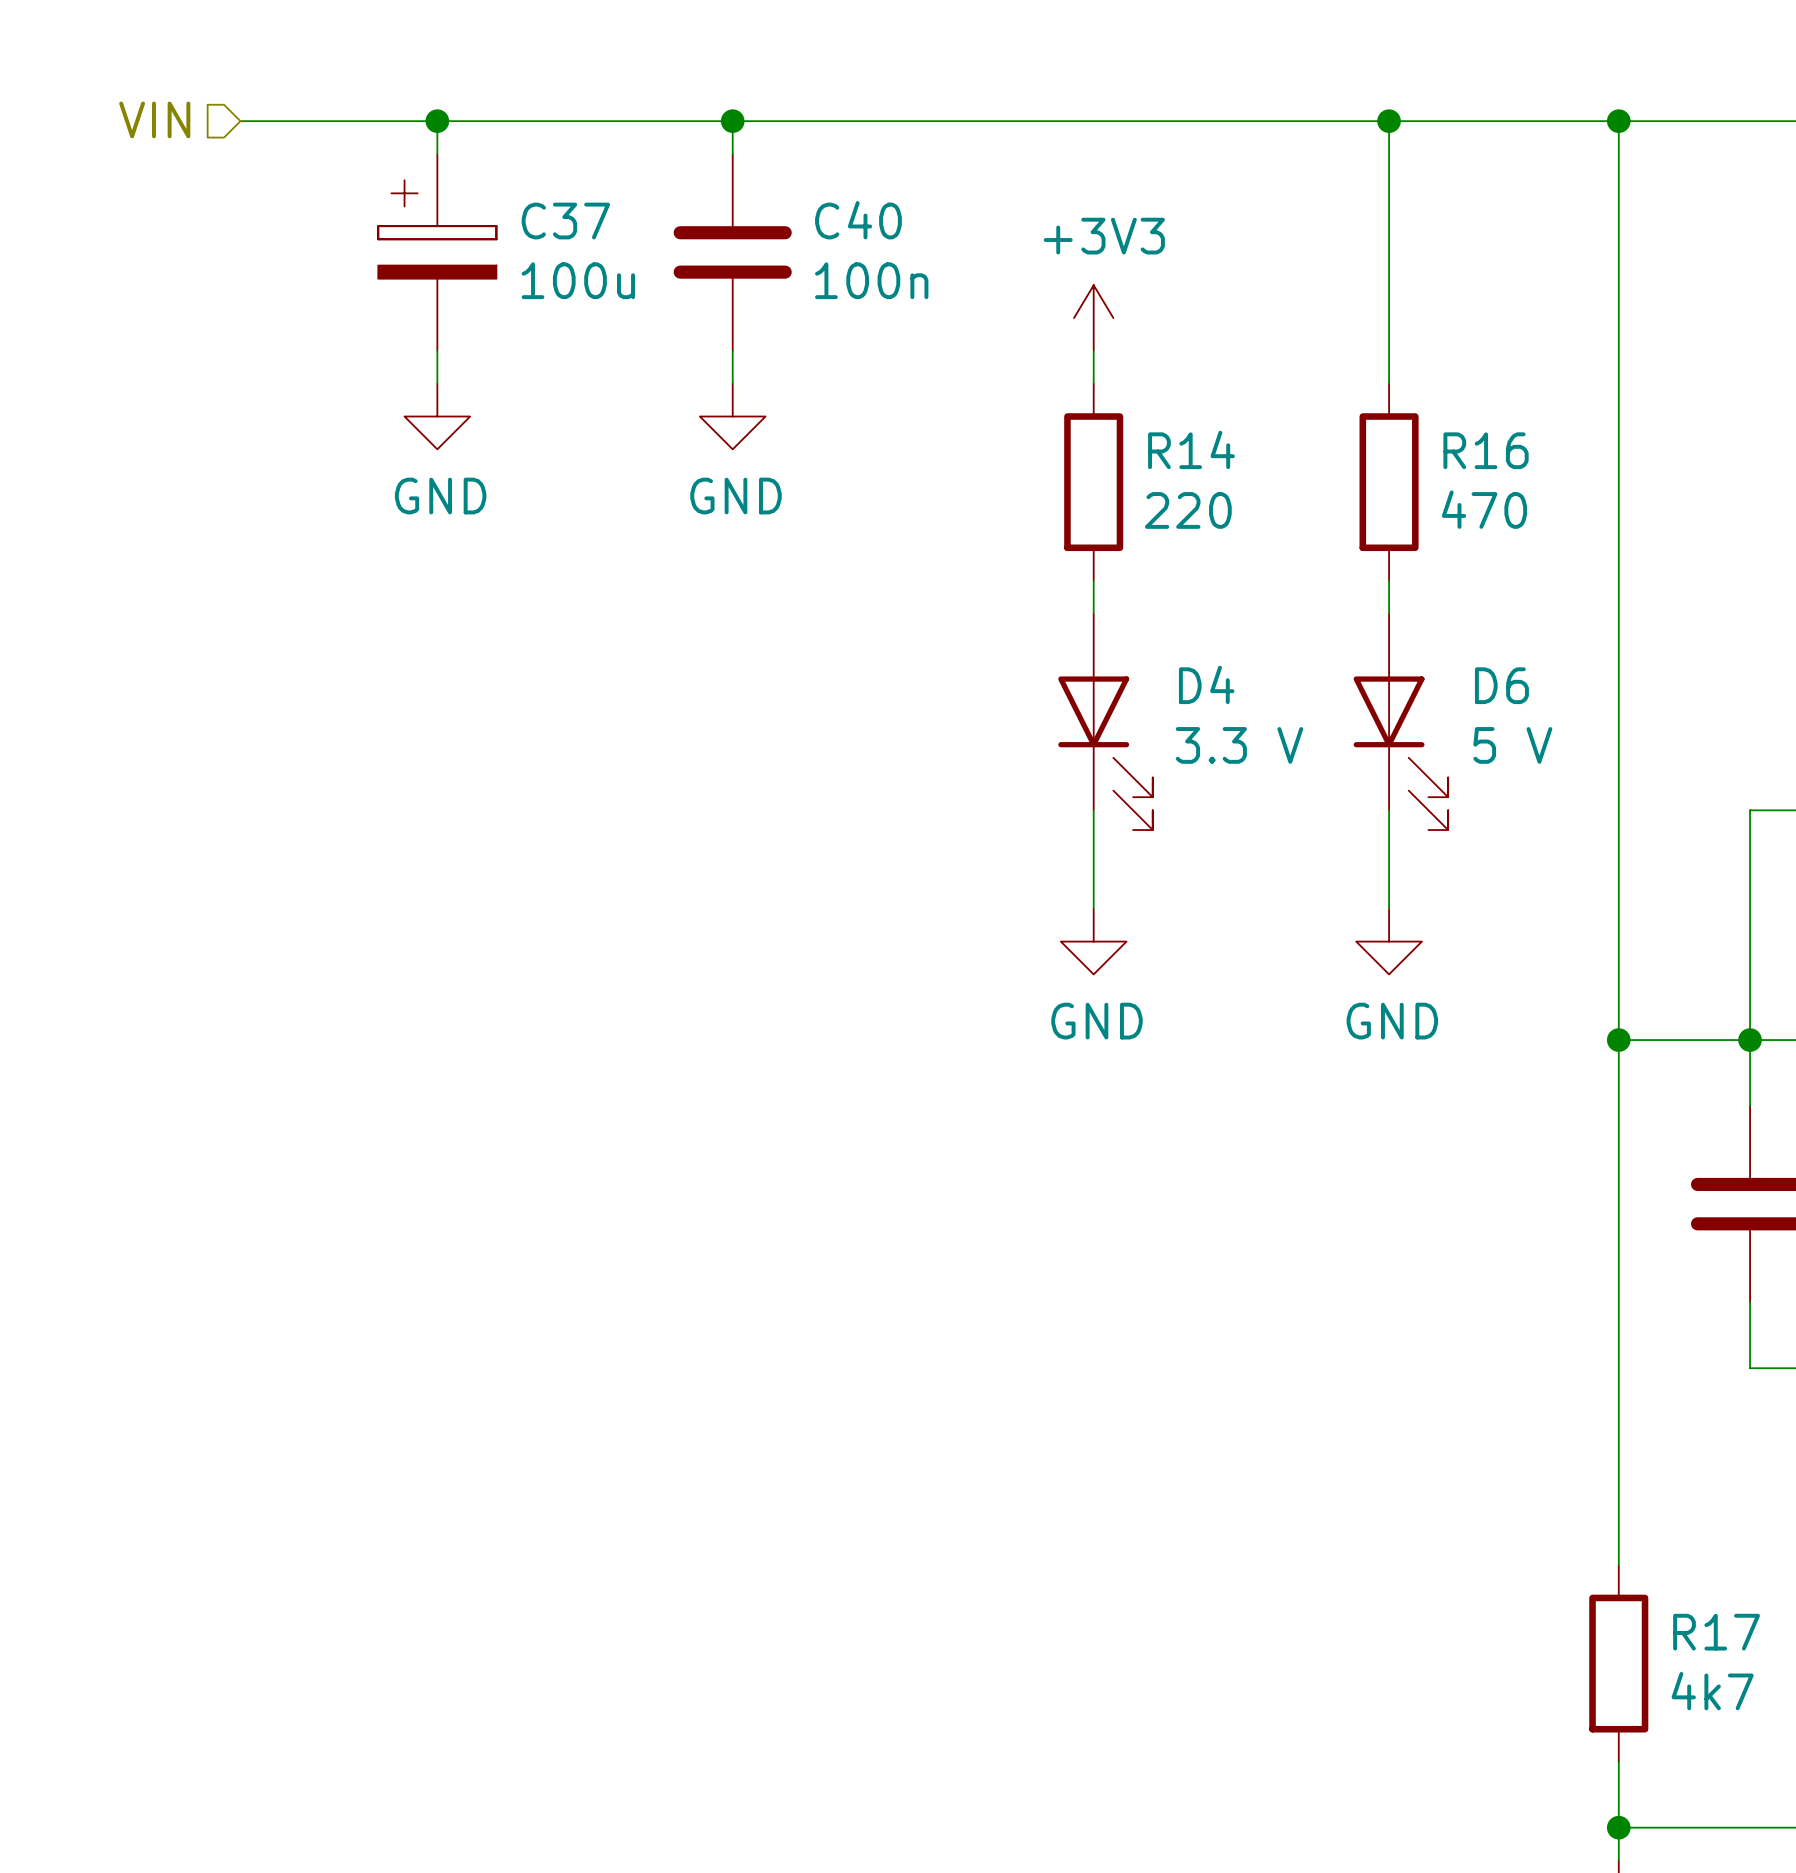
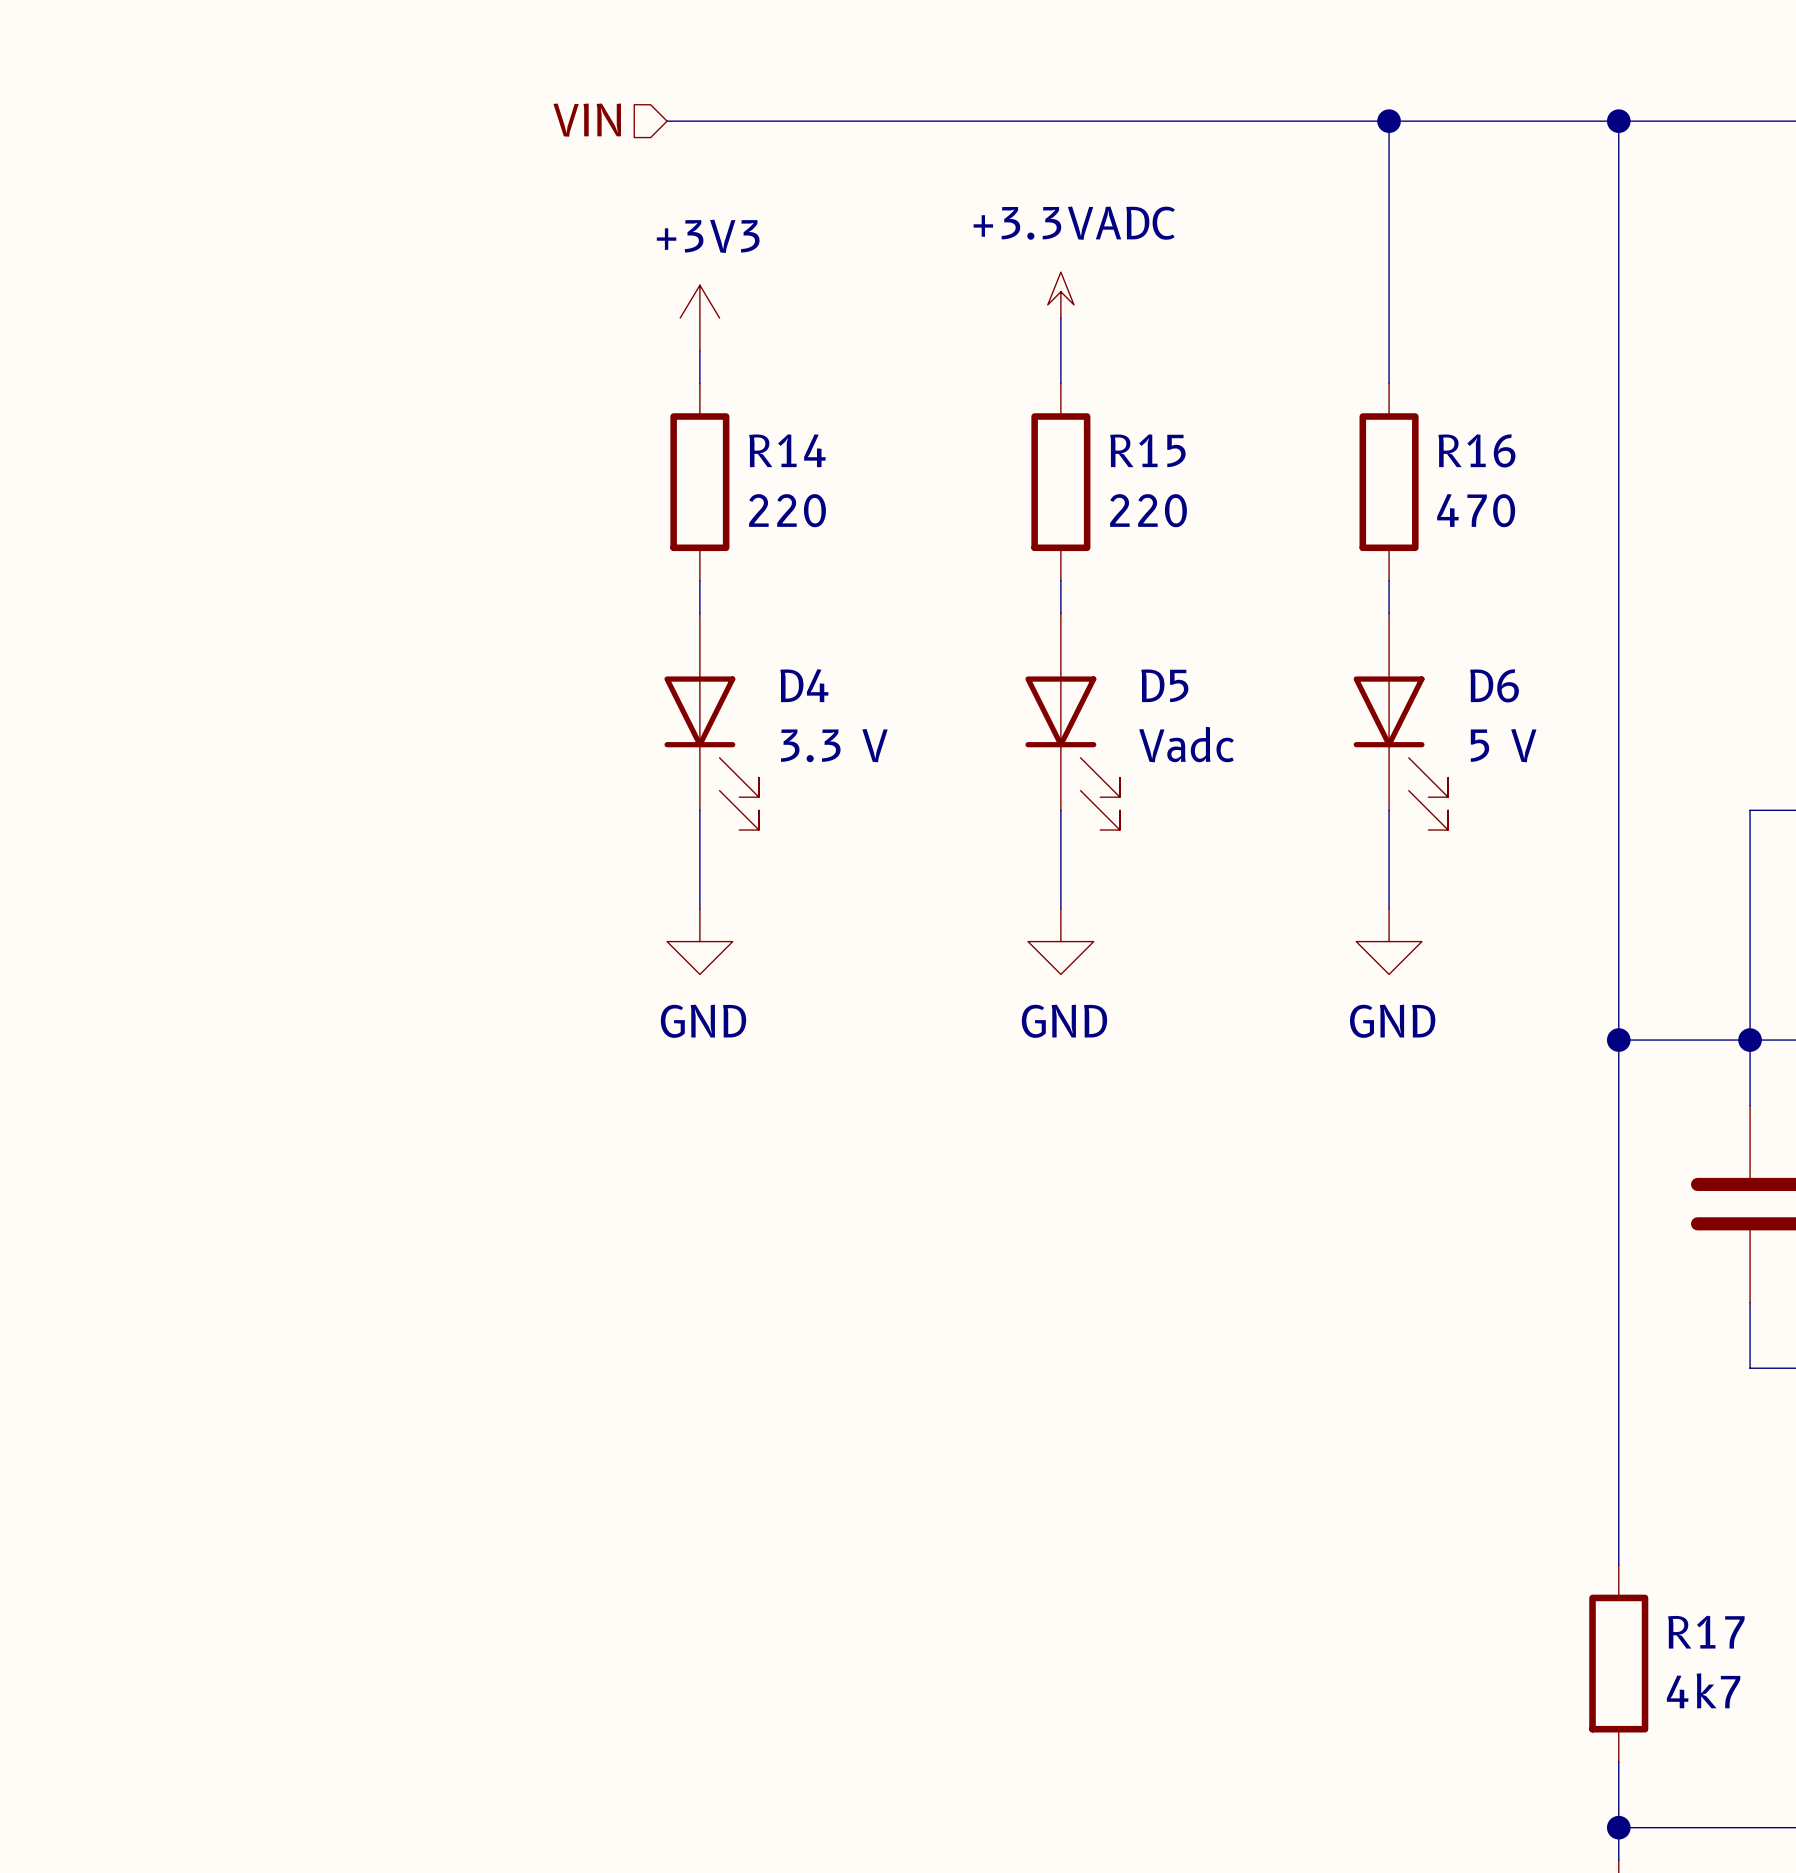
hierarchical label position: VIN (154, 119) -> VIN (587, 120)
wire: (240, 121) (667, 121) -> none
wire: (437, 121) (437, 153) -> none
junction: (437, 121) -> none
wire: (732, 121) (732, 153) -> none
junction: (732, 121) -> none
C37: 100u (437, 252) -> none
C40: 100n (732, 252) -> none
power symbol: none -> +3.3VADC (1060, 295)
wire: none -> (1060, 318) (1060, 383)
power symbol position: +3V3 (1093, 318) -> +3V3 (699, 318)
wire: (437, 350) (437, 383) -> (699, 580) (699, 613)
wire: (732, 350) (732, 383) -> (699, 350) (699, 383)
wire: (1093, 350) (1093, 383) -> none
power symbol: GND (437, 416) -> none
power symbol: GND (732, 416) -> none
R15: none -> 220 (1060, 482)
R14 position: (1093, 482) -> (699, 482)
wire: (1093, 580) (1093, 613) -> (1060, 580) (1060, 613)
D5: none -> Vadc (1072, 721)
D4 position: (1105, 721) -> (711, 721)
wire: none -> (699, 810) (699, 908)
wire: (1093, 810) (1093, 908) -> (1060, 810) (1060, 908)
power symbol: none -> GND (699, 941)
power symbol position: GND (1093, 941) -> GND (1060, 941)

